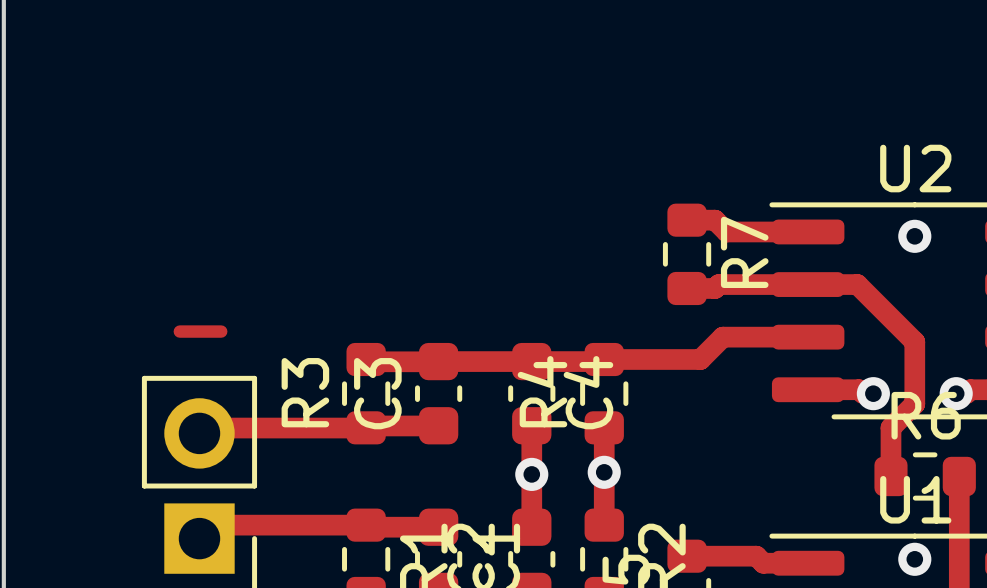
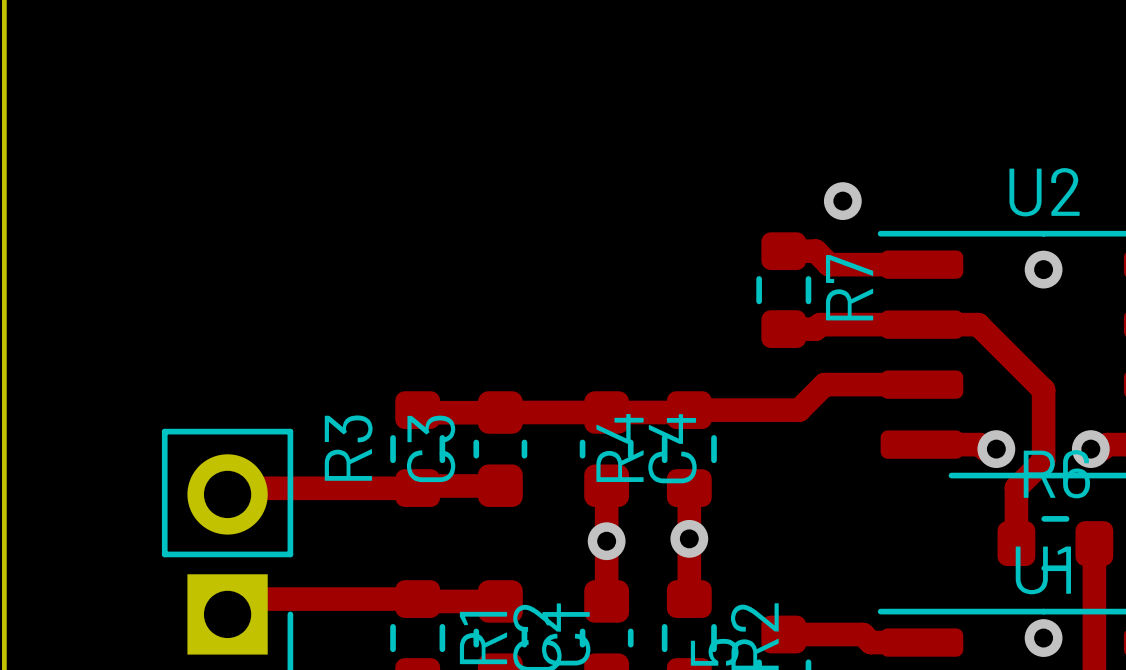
via: none -> (842, 201)
track: (179, 331) (221, 331) -> none

